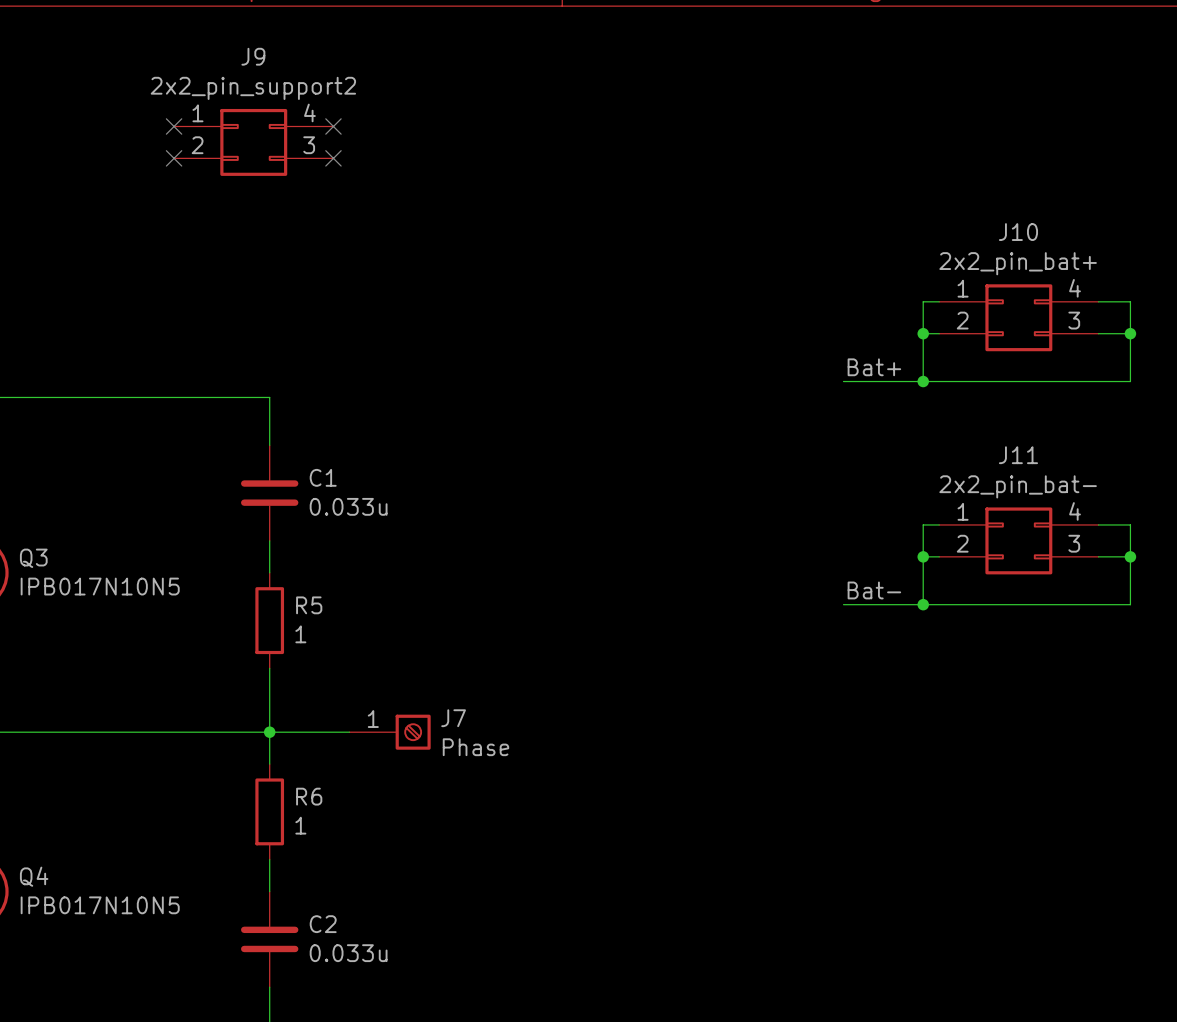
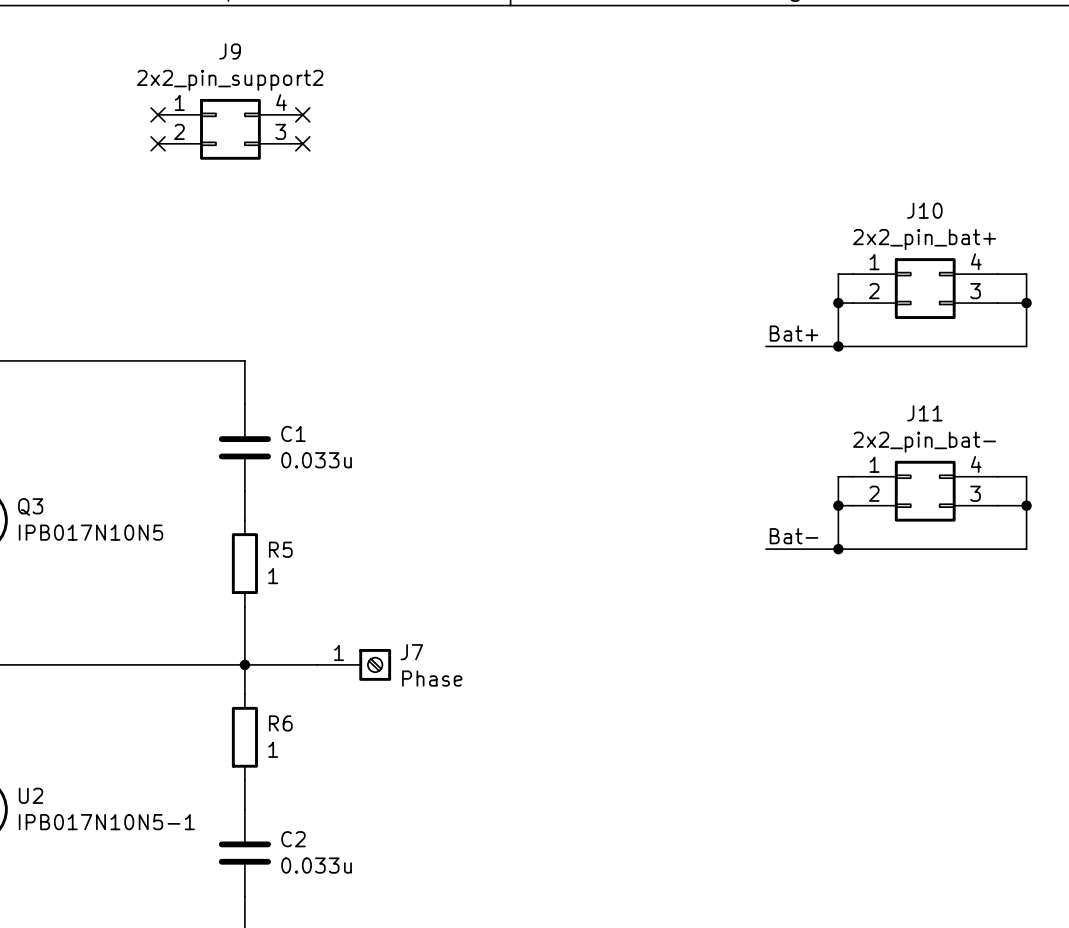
Q4 name: Q4 (34, 876) -> U2 (31, 795)
Q4 value: IPB017N10N5 (100, 905) -> IPB017N10N5-1 (106, 822)

